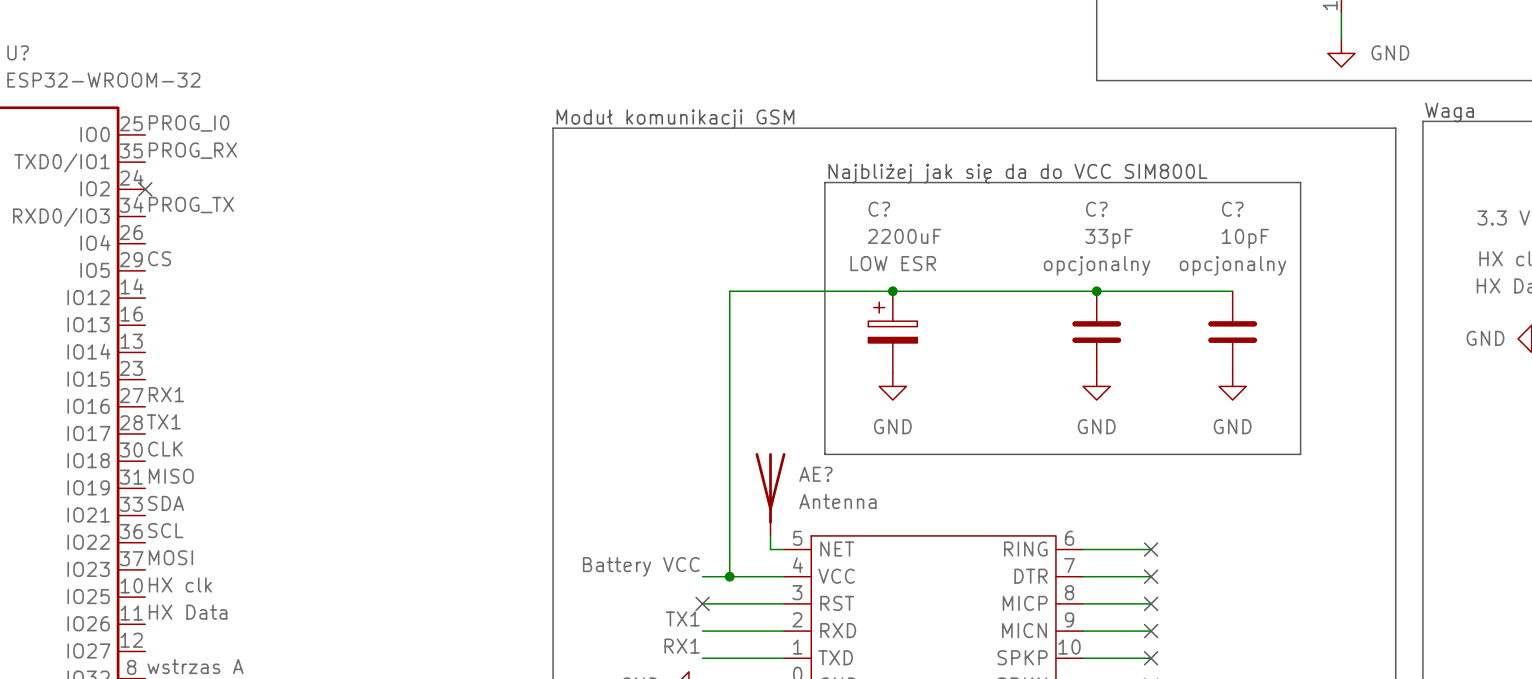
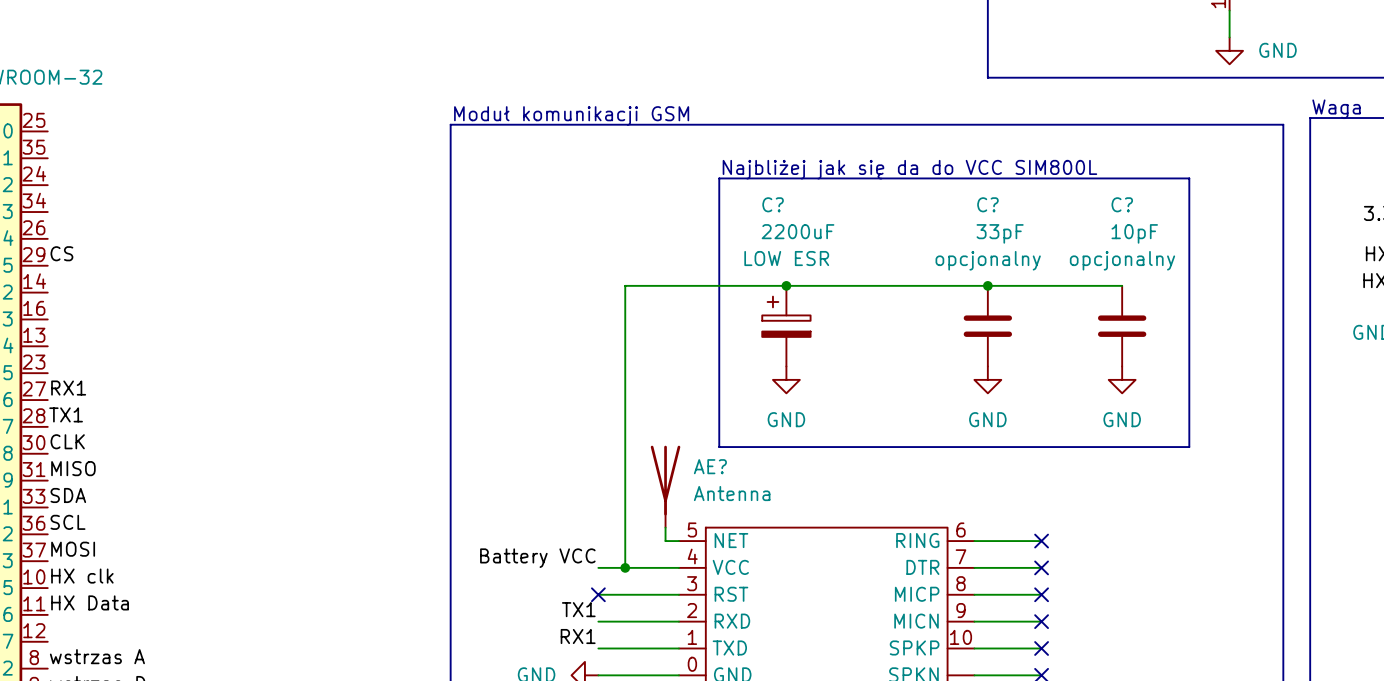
label: PROG_I0 (189, 123) -> none
label: PROG_RX (192, 150) -> none
no-connect mark: (145, 189) -> none
label: PROG_TX (191, 205) -> none

